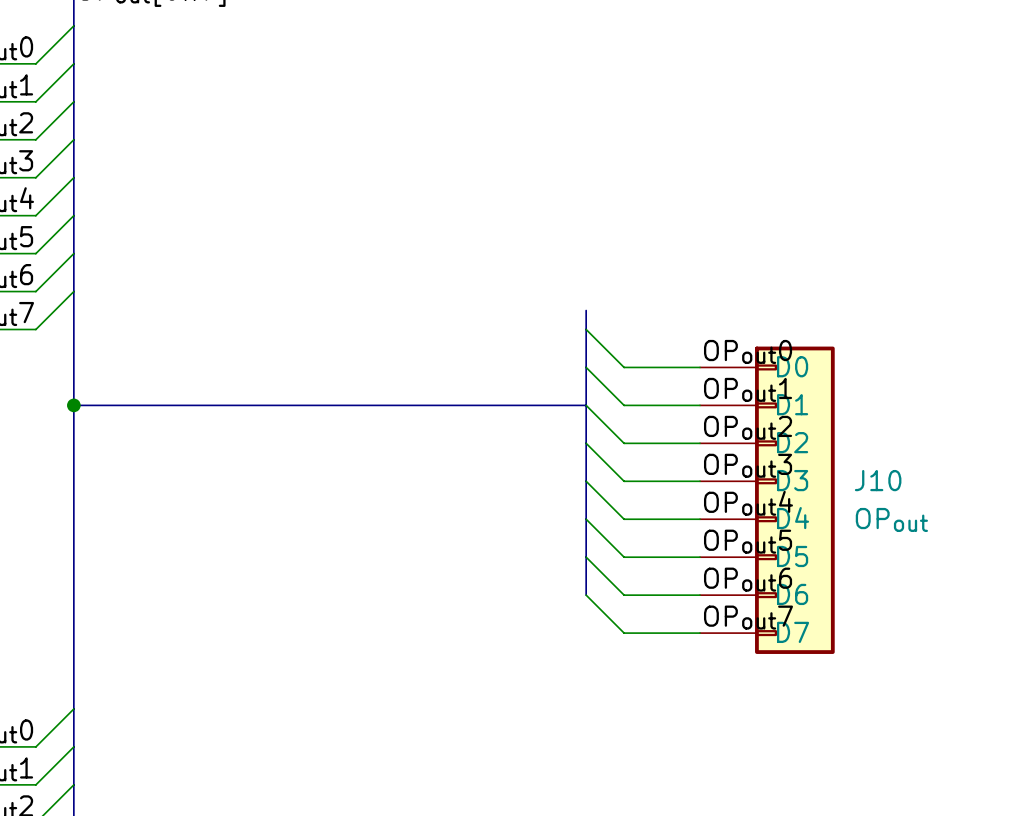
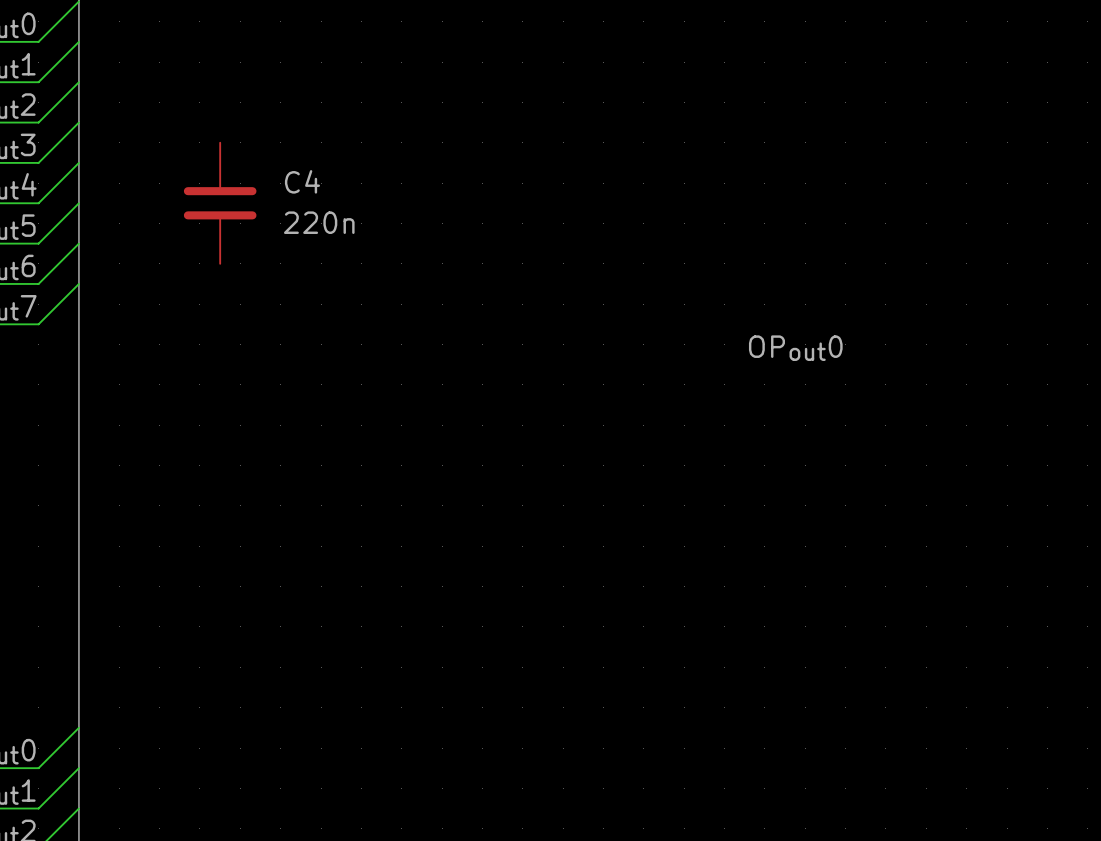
C4: none -> 220n (220, 203)
bus: (586, 310) (586, 595) -> none
wire: (586, 329) (624, 367) (700, 367) -> none
wire: (586, 367) (624, 405) (700, 405) -> none
label: OPout1 (748, 389) -> none
bus: (73, 405) (586, 405) -> none
junction: (73, 405) -> none
wire: (586, 405) (624, 443) (700, 443) -> none
label: OPout2 (748, 427) -> none
wire: (586, 443) (624, 481) (700, 481) -> none
label: OPout3 (748, 465) -> none
wire: (586, 481) (624, 519) (700, 519) -> none
J10: OPout (767, 500) -> none
label: OPout4 (748, 503) -> none
wire: (586, 519) (624, 557) (700, 557) -> none
label: OPout5 (748, 541) -> none
wire: (586, 557) (624, 595) (700, 595) -> none
label: OPout6 (748, 579) -> none
wire: (586, 595) (624, 633) (700, 633) -> none
label: OPout7 (748, 617) -> none

